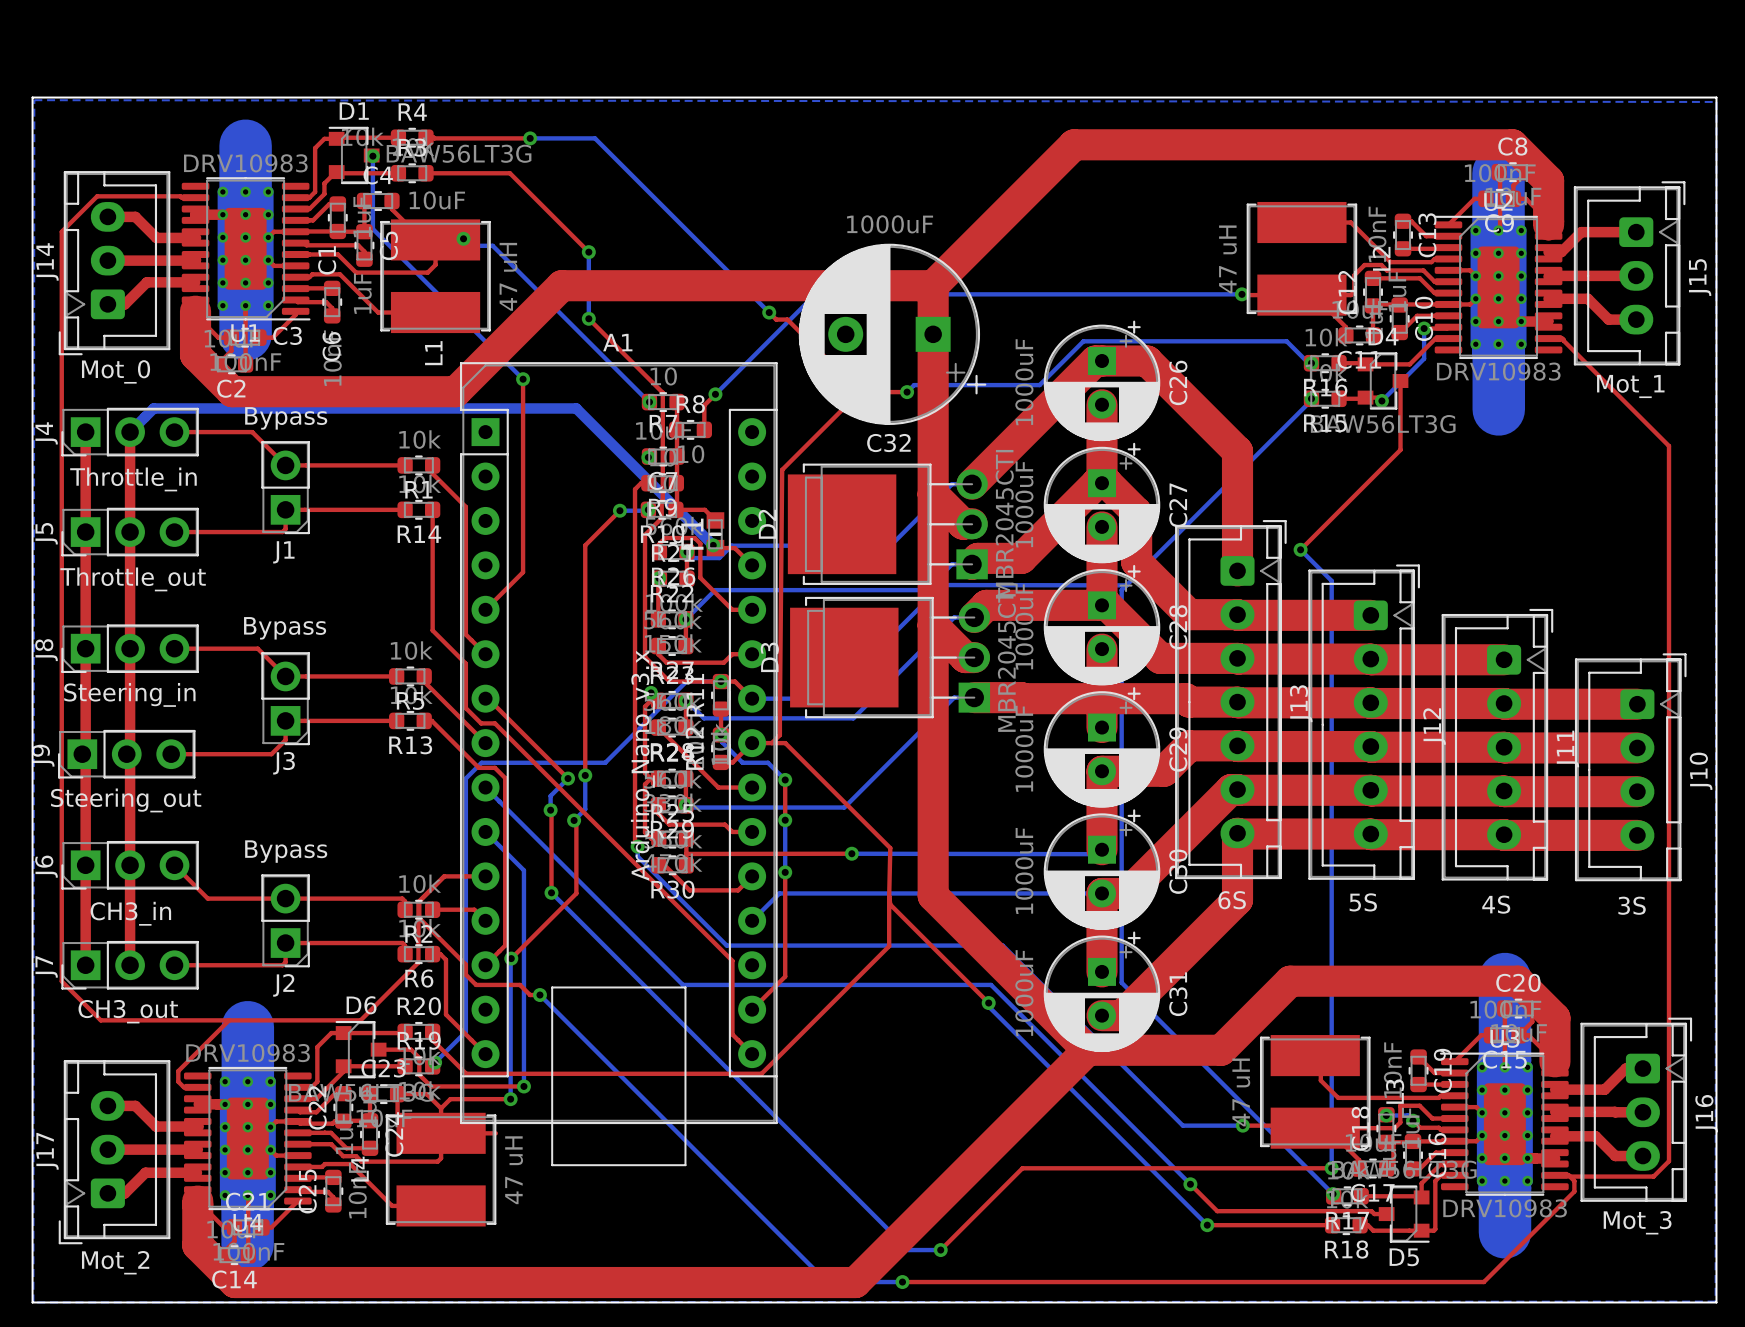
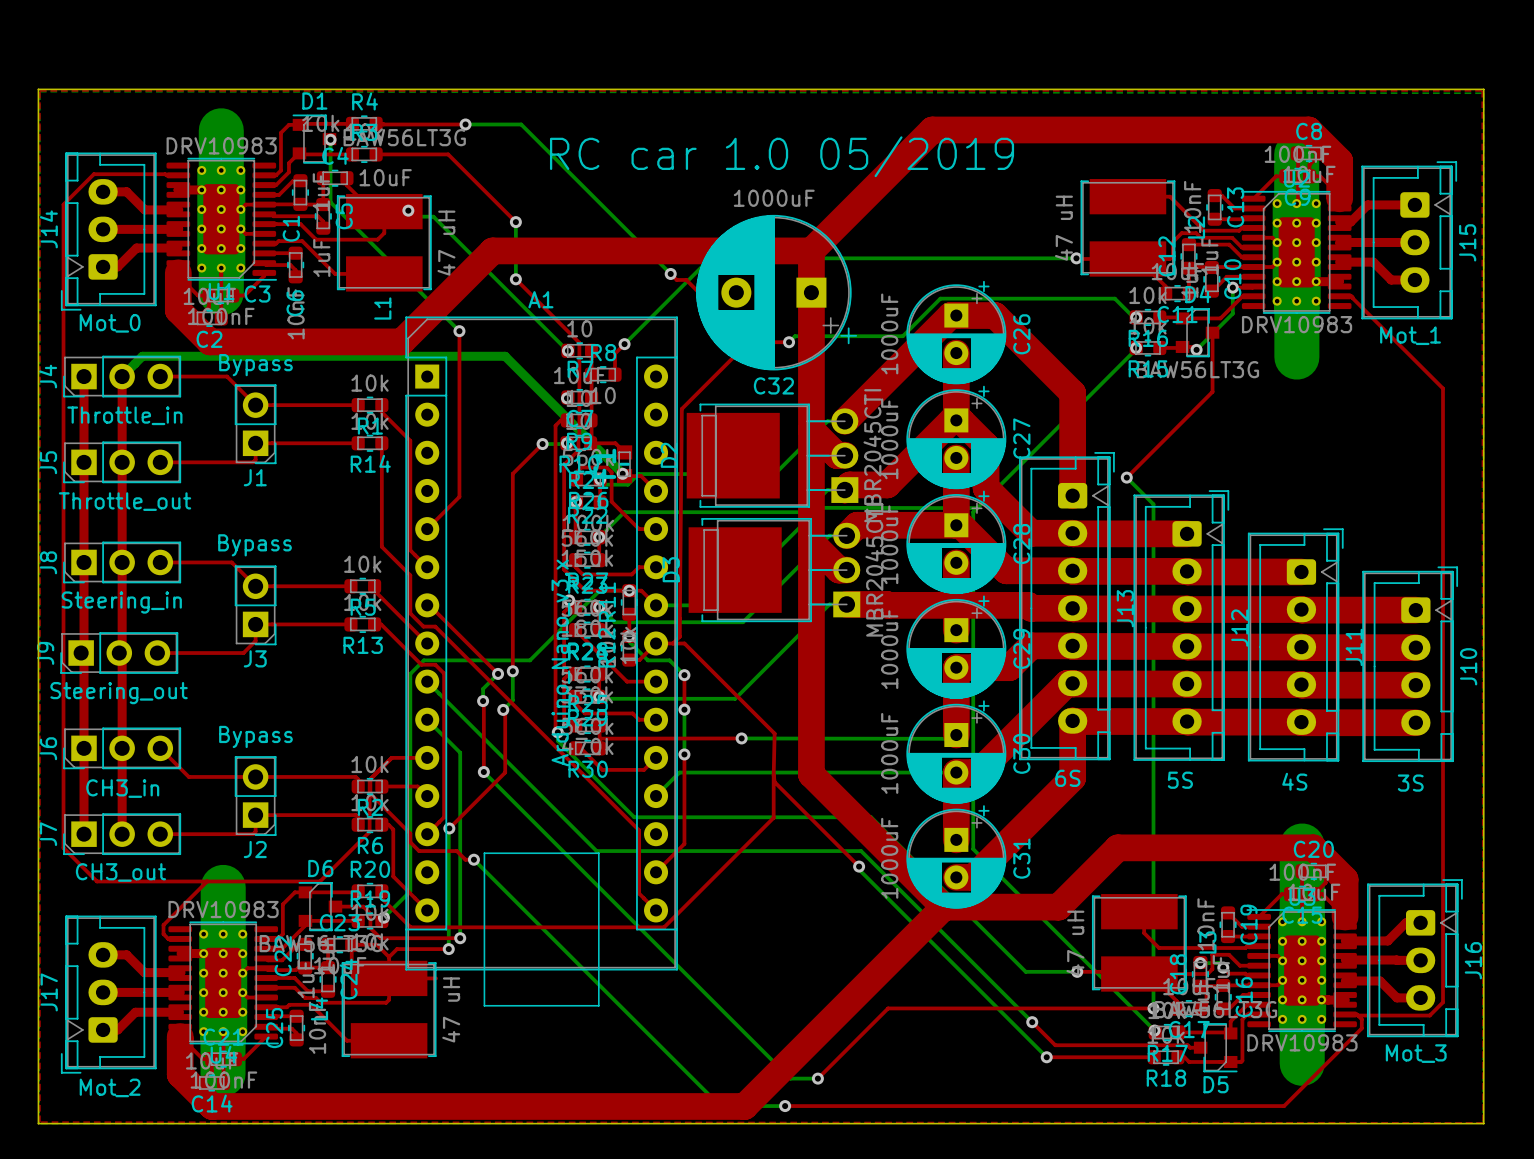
top zone outline: none -> (39, 90) (39, 1122) (1482, 1122) (1482, 90) (39, 90)
text: none -> RC car 1.0 05/2019 (782, 156)

